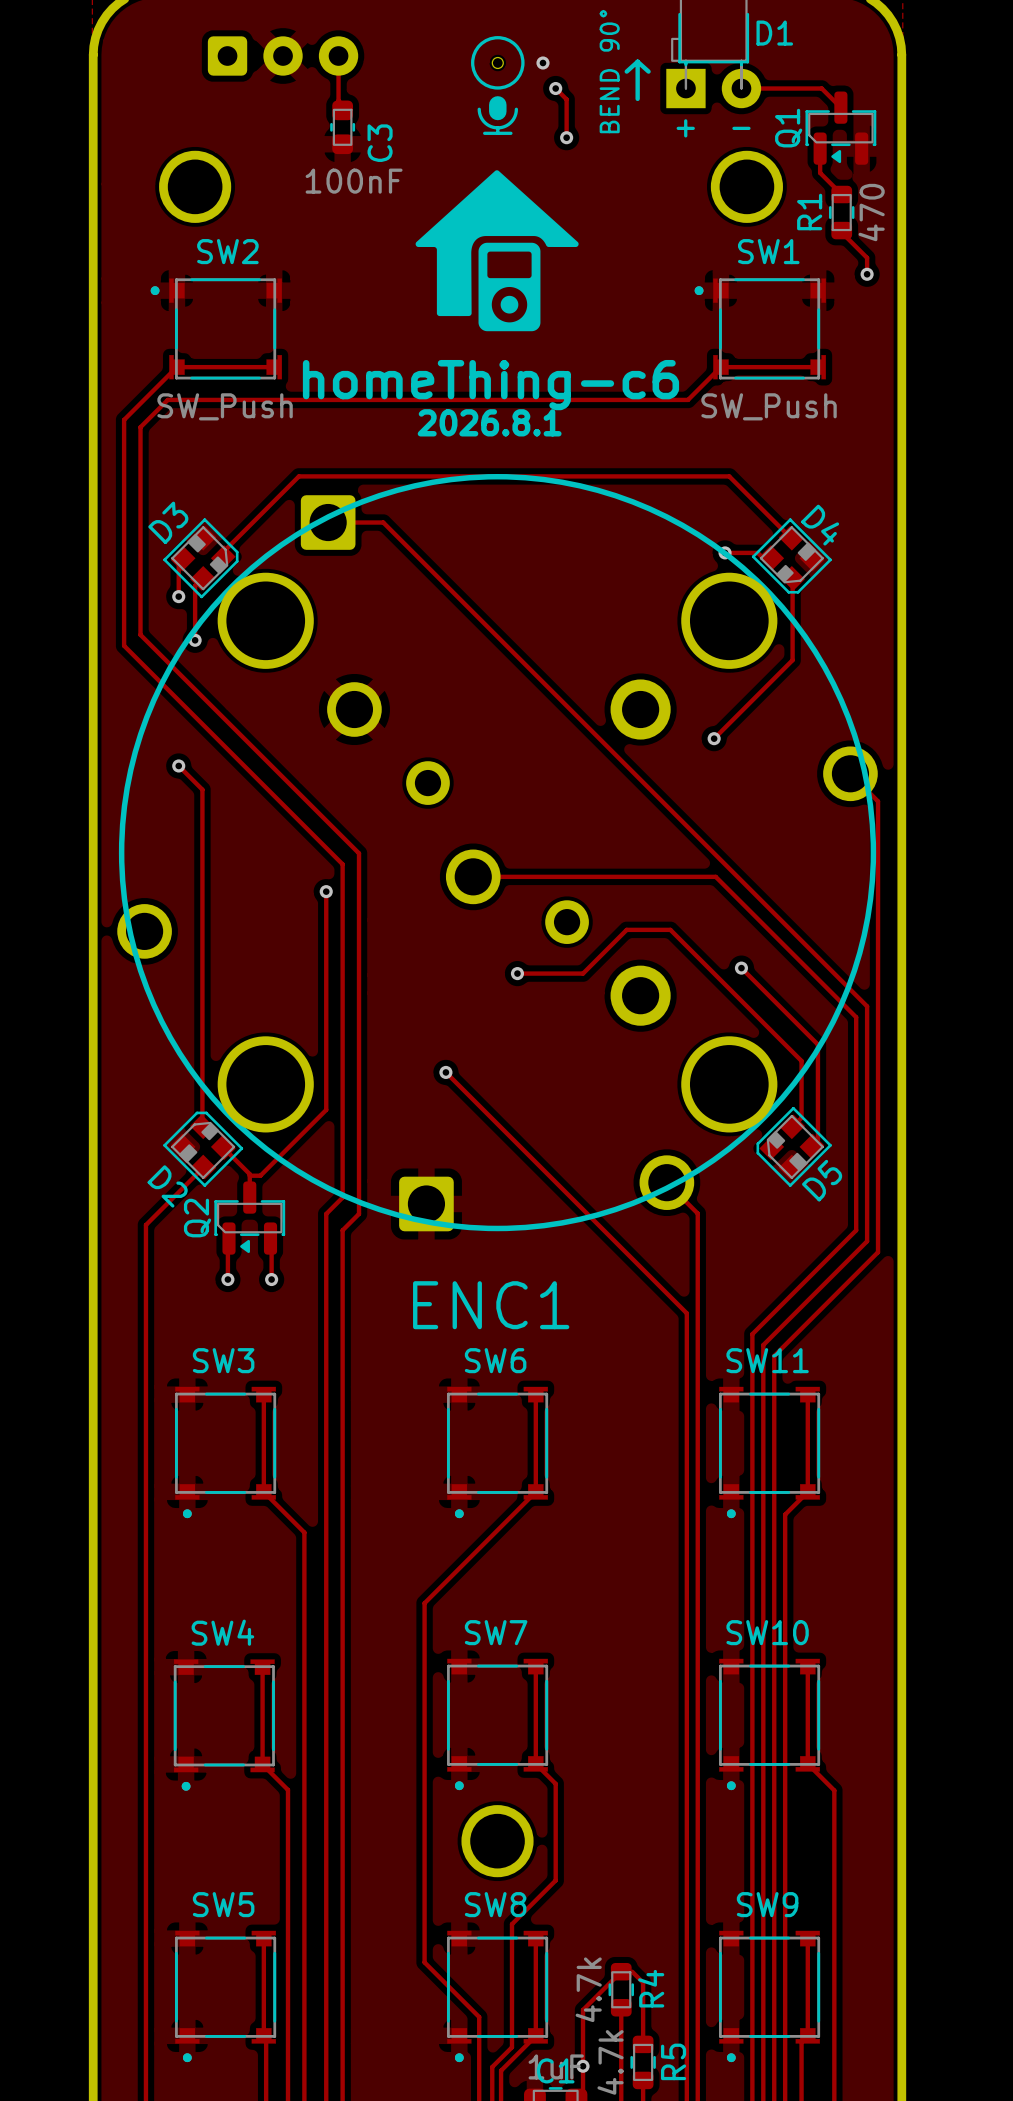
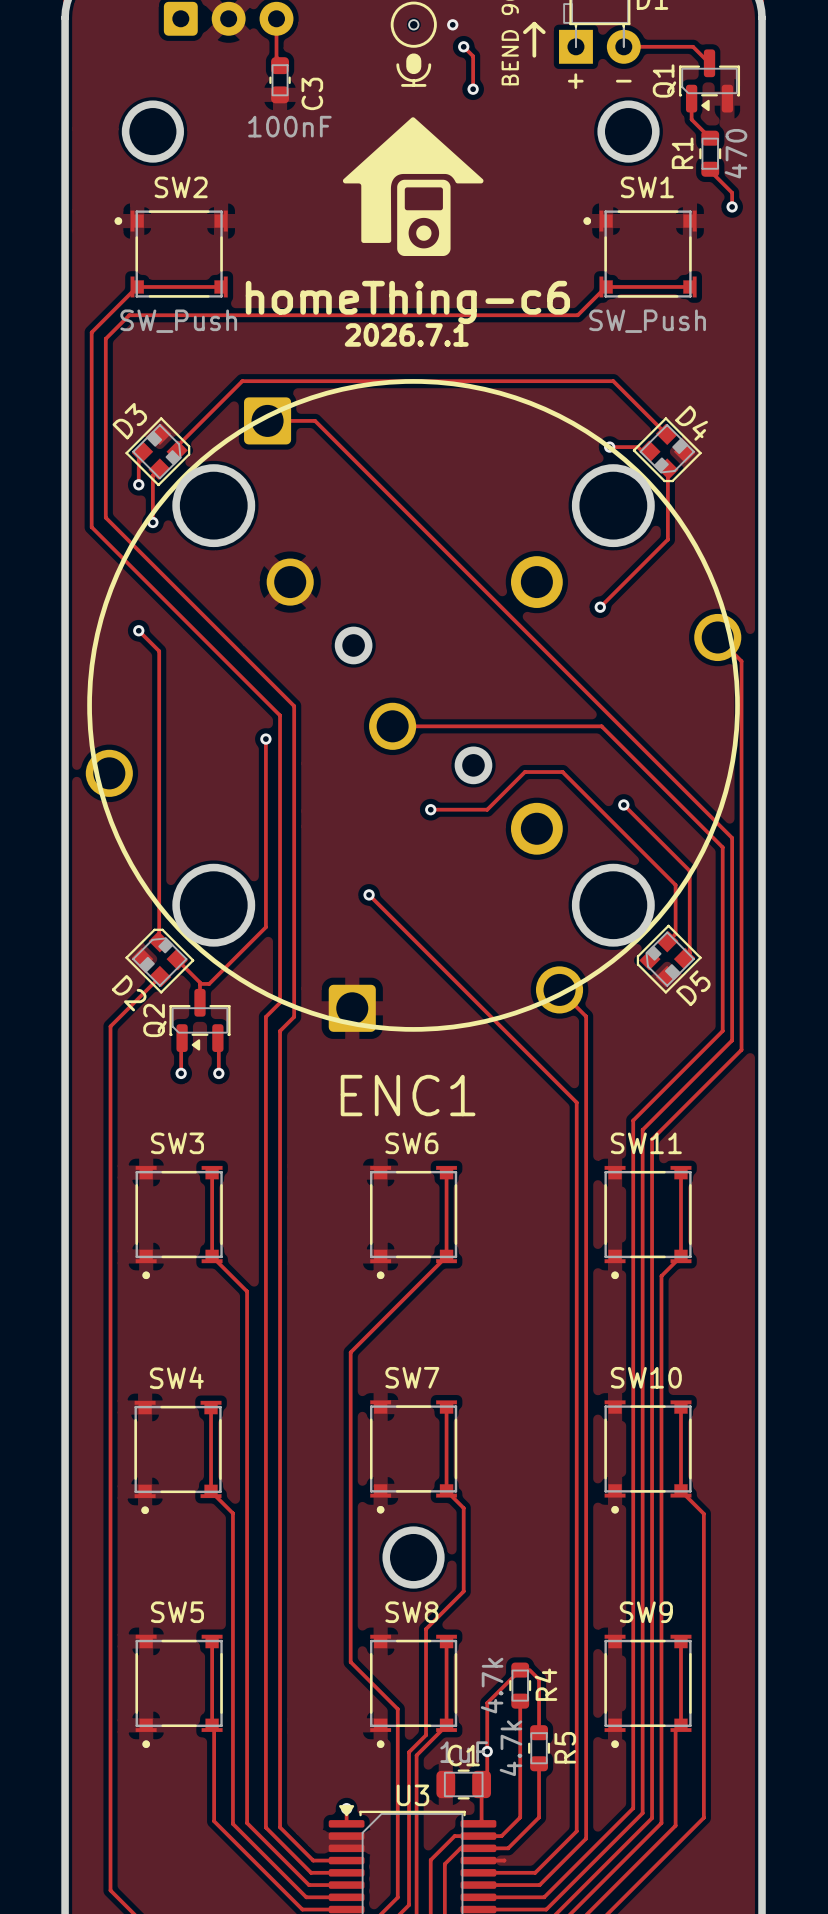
text: 2026.8.1 (489, 422) -> 2026.7.1 (406, 334)

